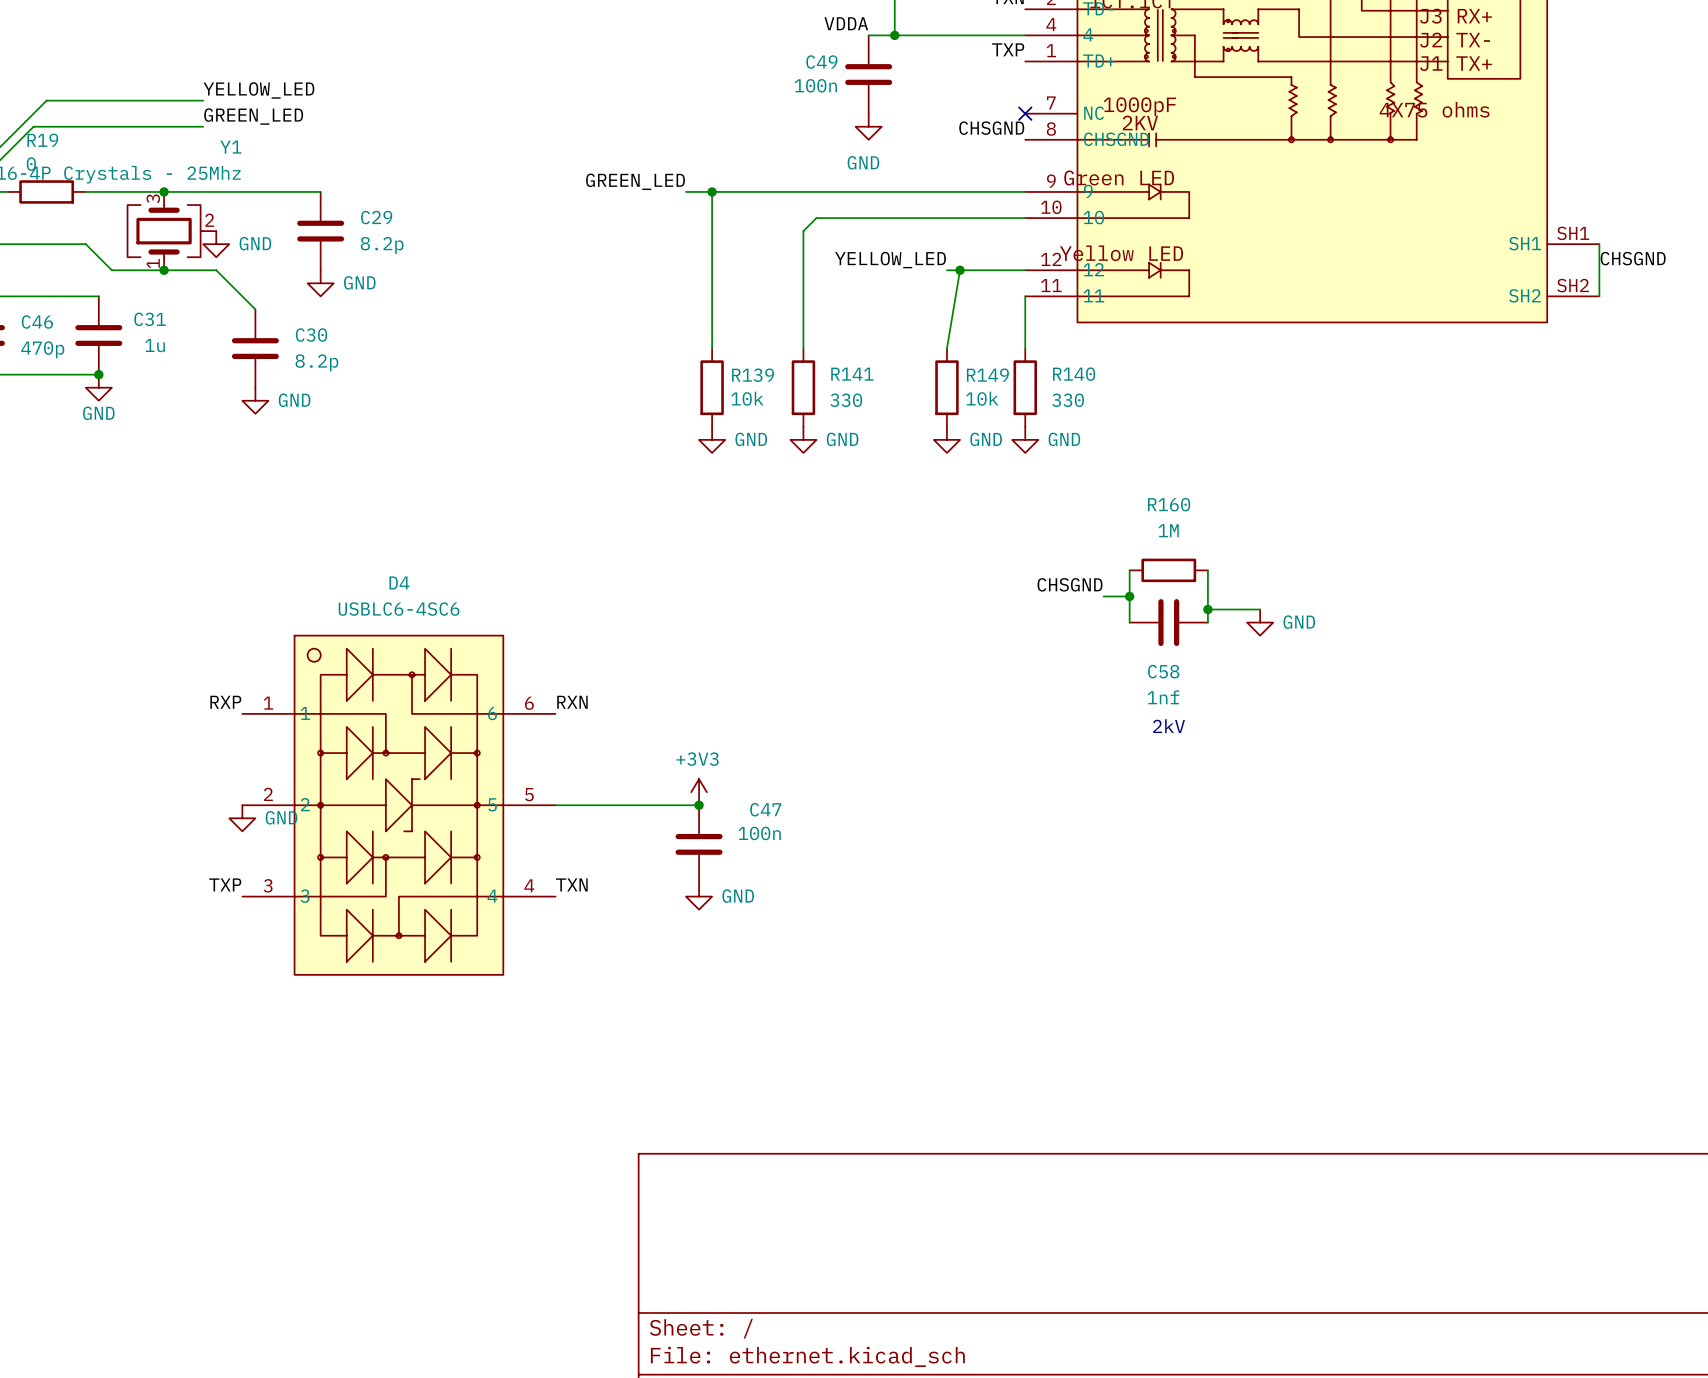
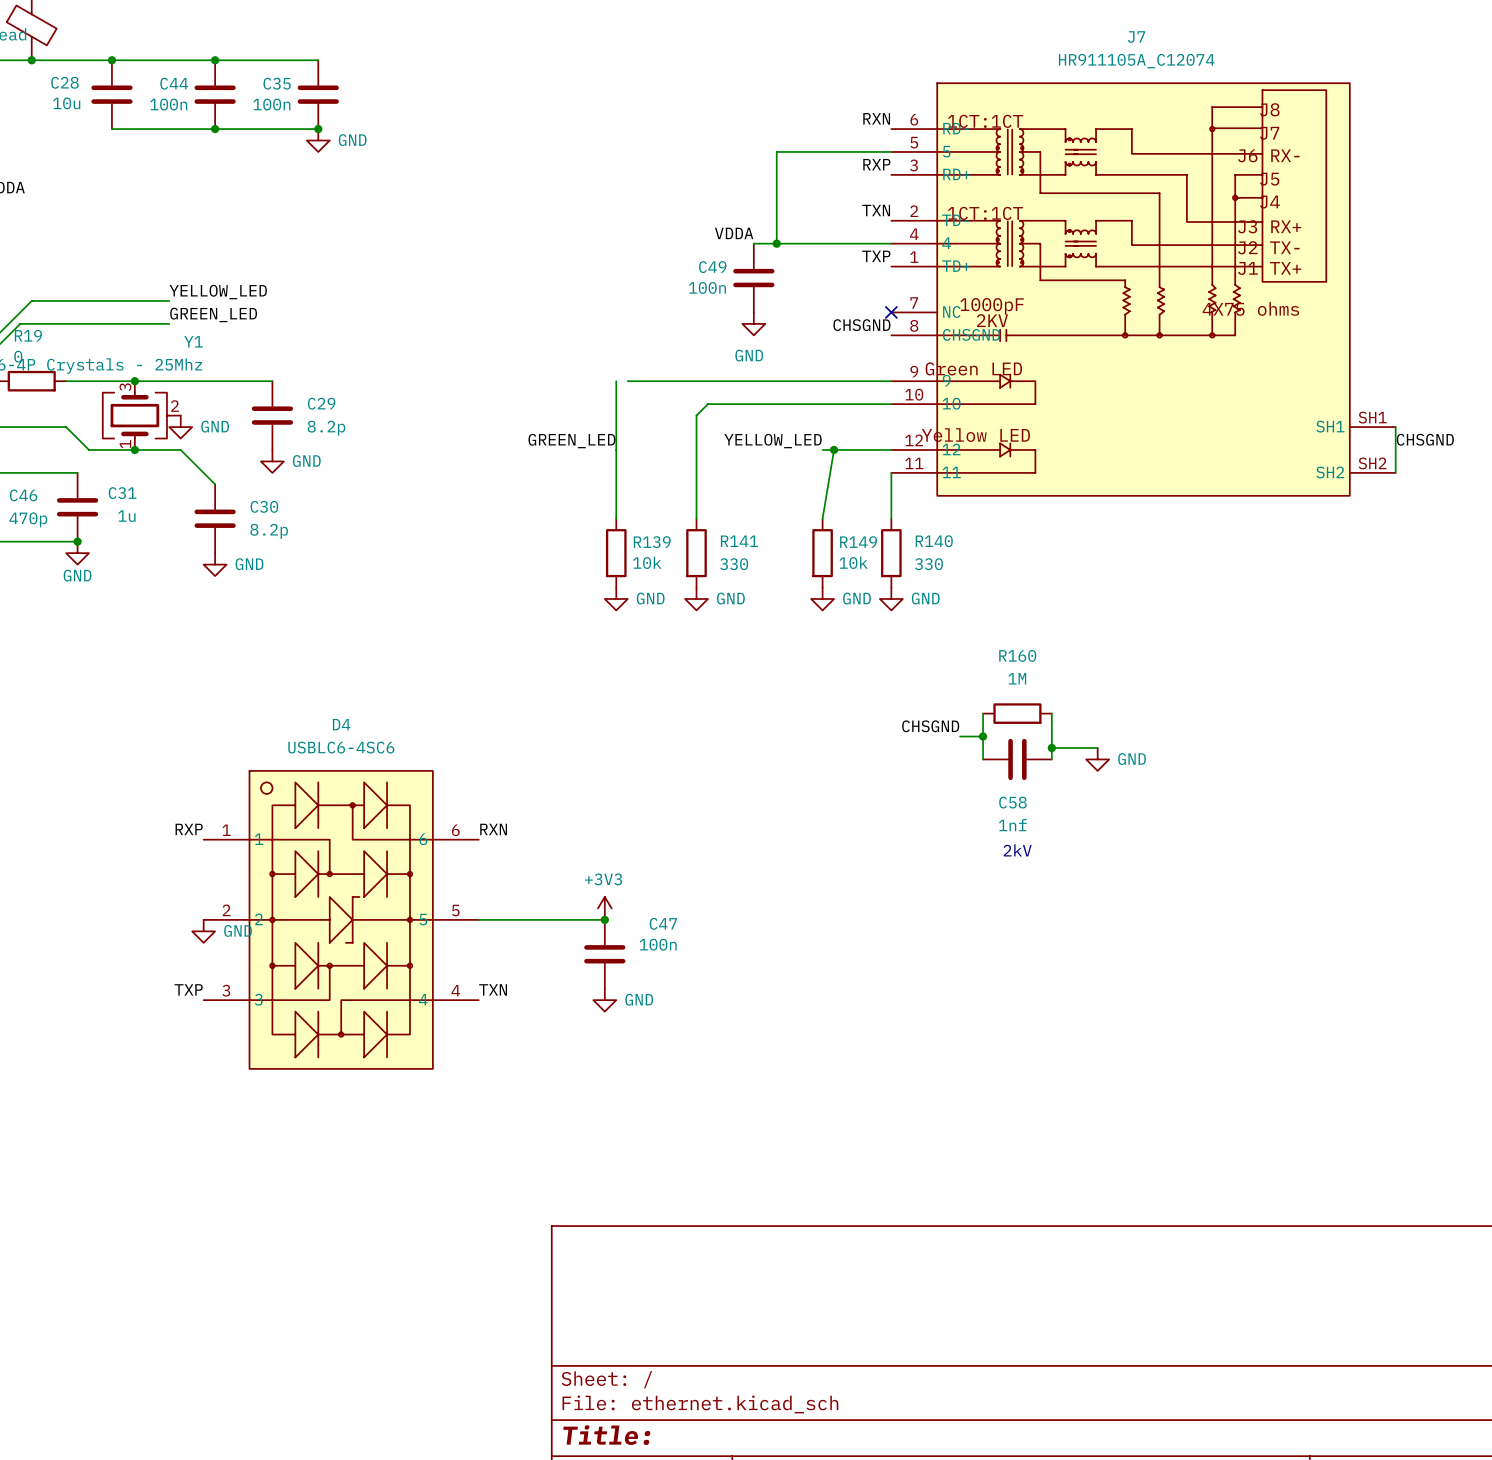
label position: GREEN_LED (635, 181) -> GREEN_LED (571, 441)
wire: (686, 191) (725, 191) -> none
junction: (712, 191) -> none

